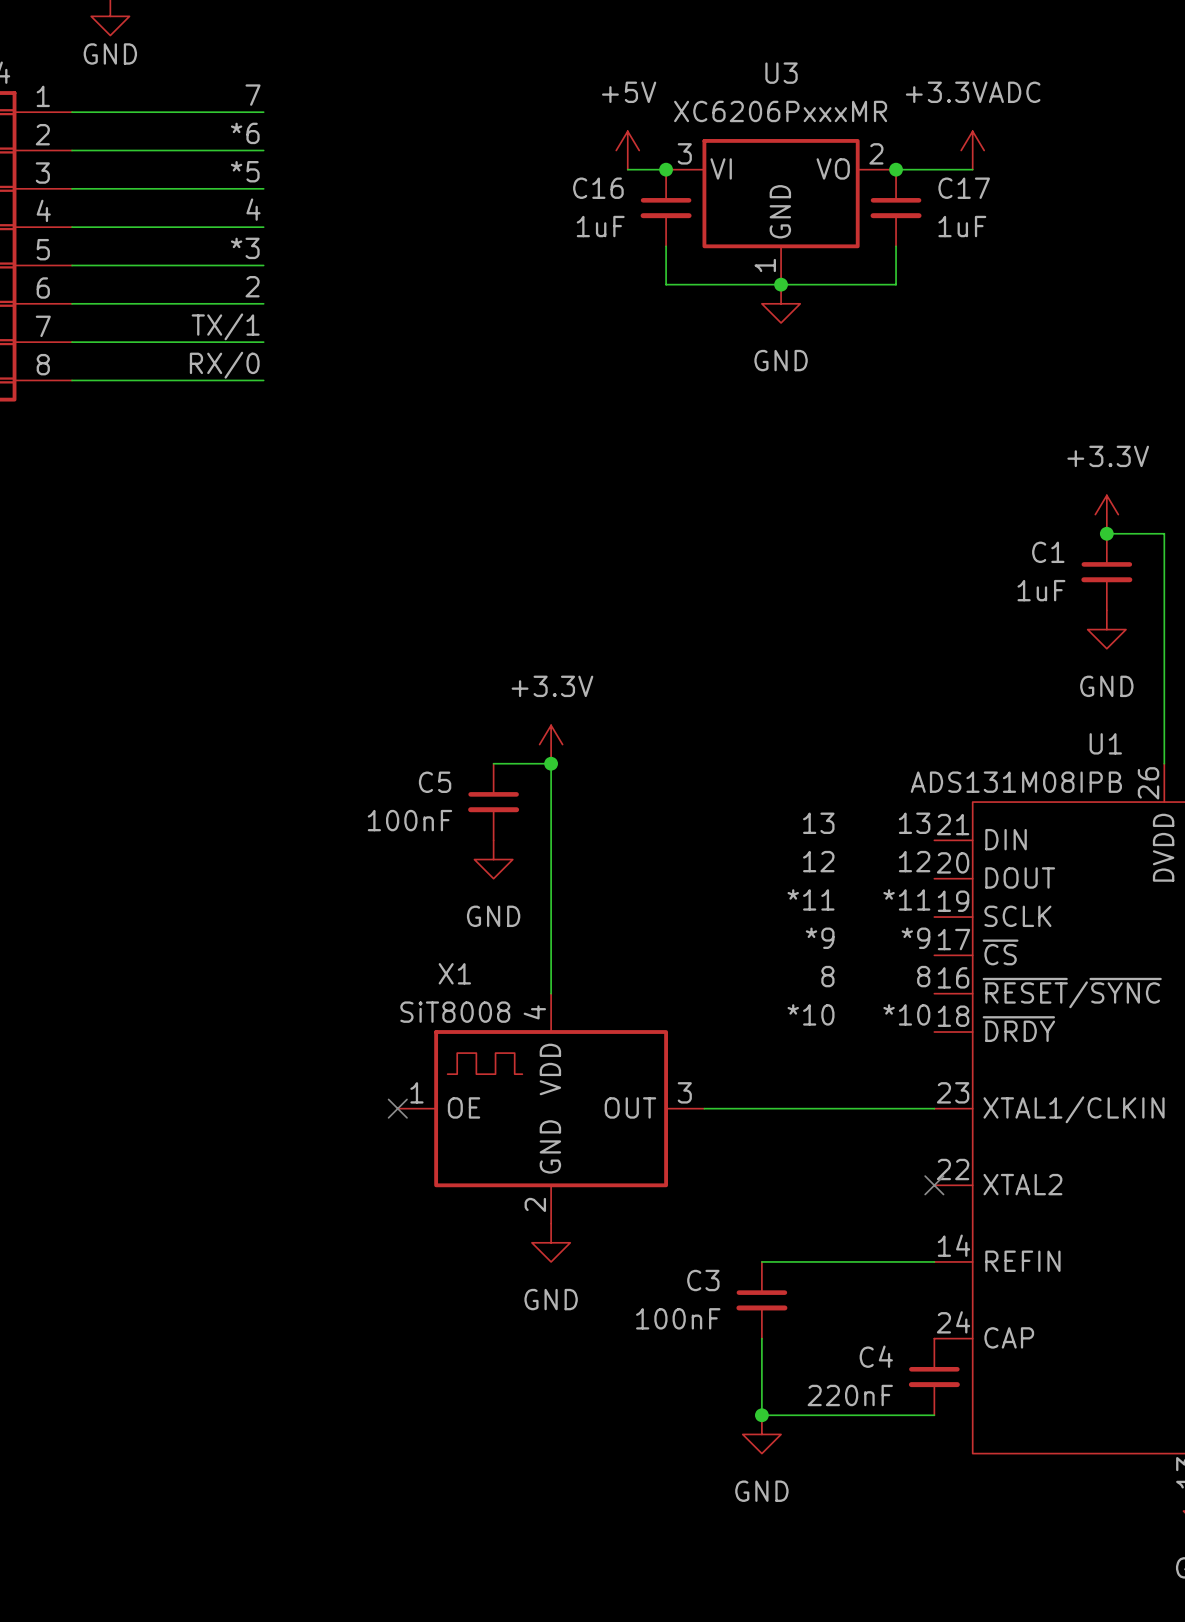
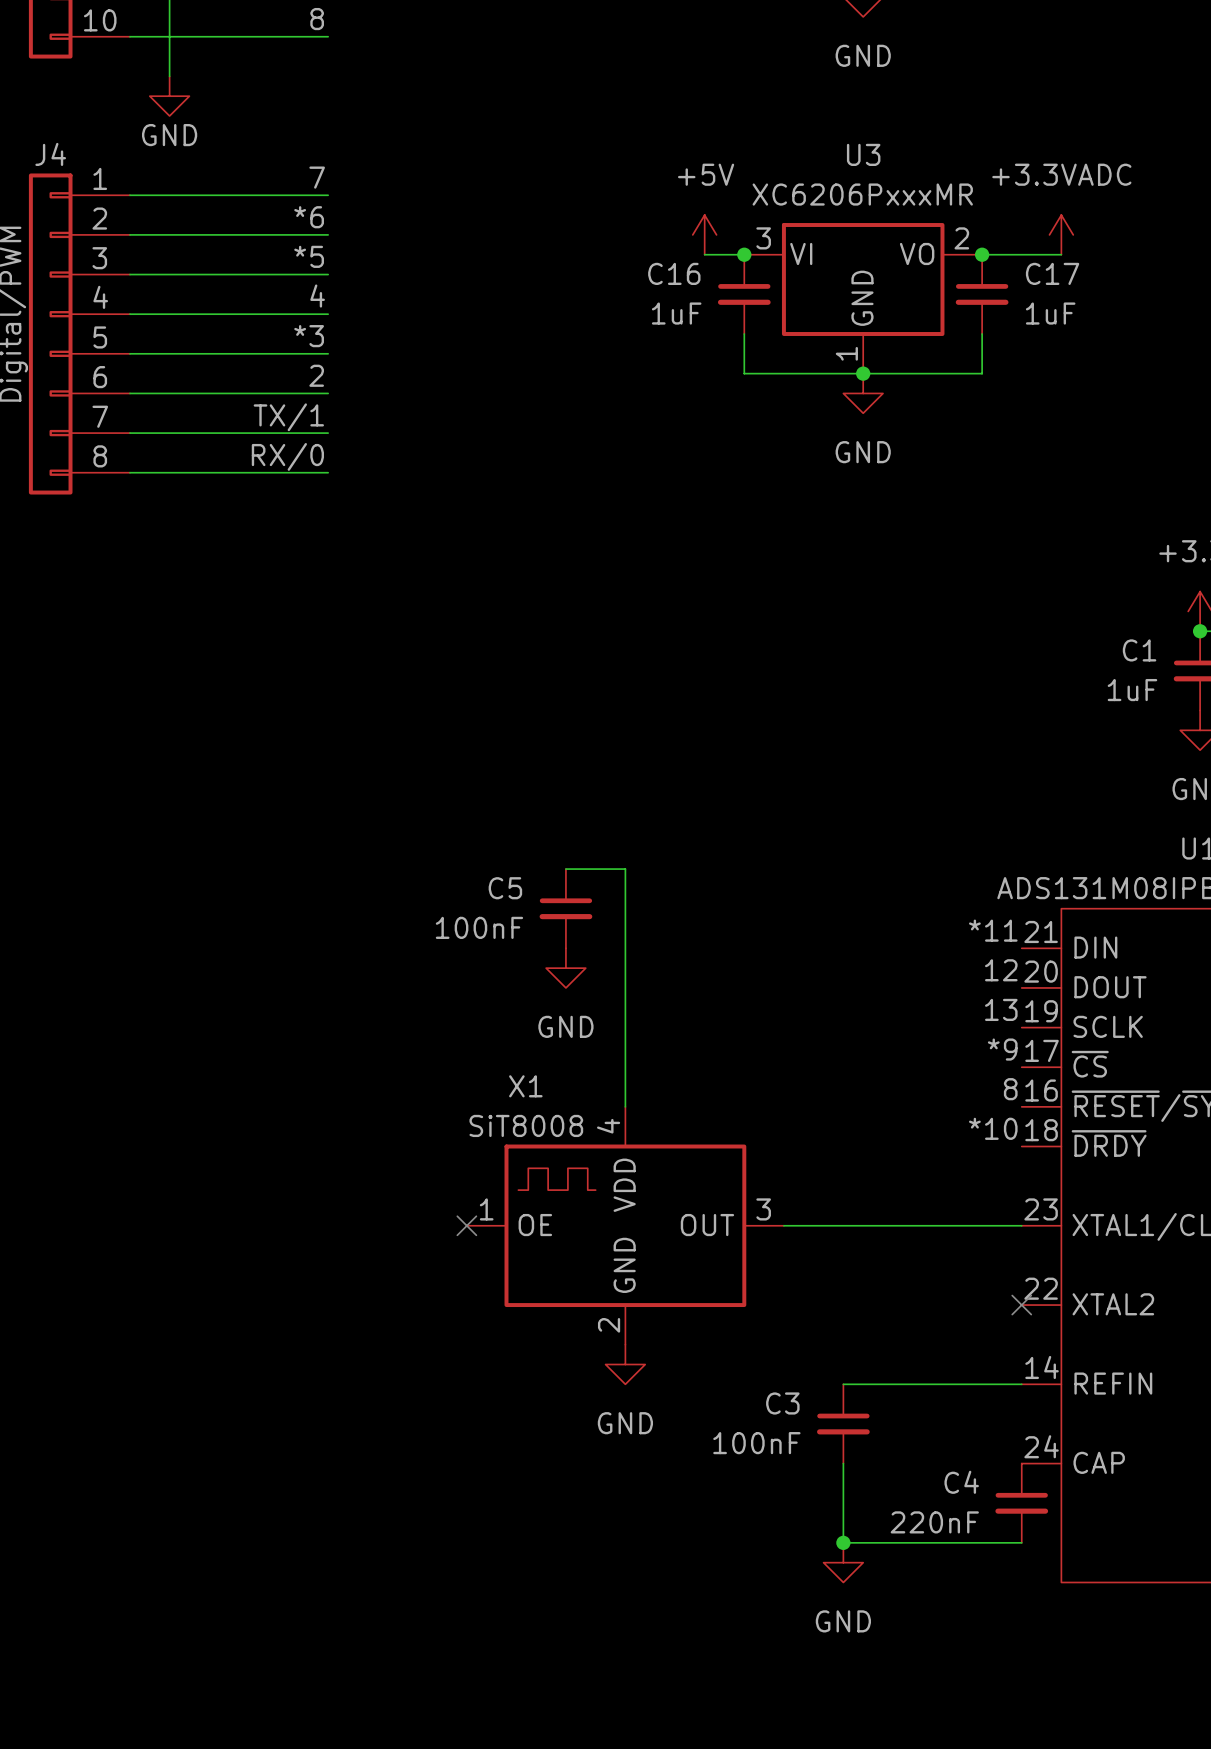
power symbol: +3.3V (551, 744) -> none
junction: (551, 763) -> none
label: 13 (818, 823) -> none
label: 13 (914, 823) -> *11 (993, 930)
label: 12 (818, 861) -> none
label: *11 (811, 899) -> none
label: *11 (906, 899) -> 13 (1001, 1009)
label: *9 (820, 938) -> none
label: 8 (827, 976) -> none
label: *10 (811, 1014) -> none

